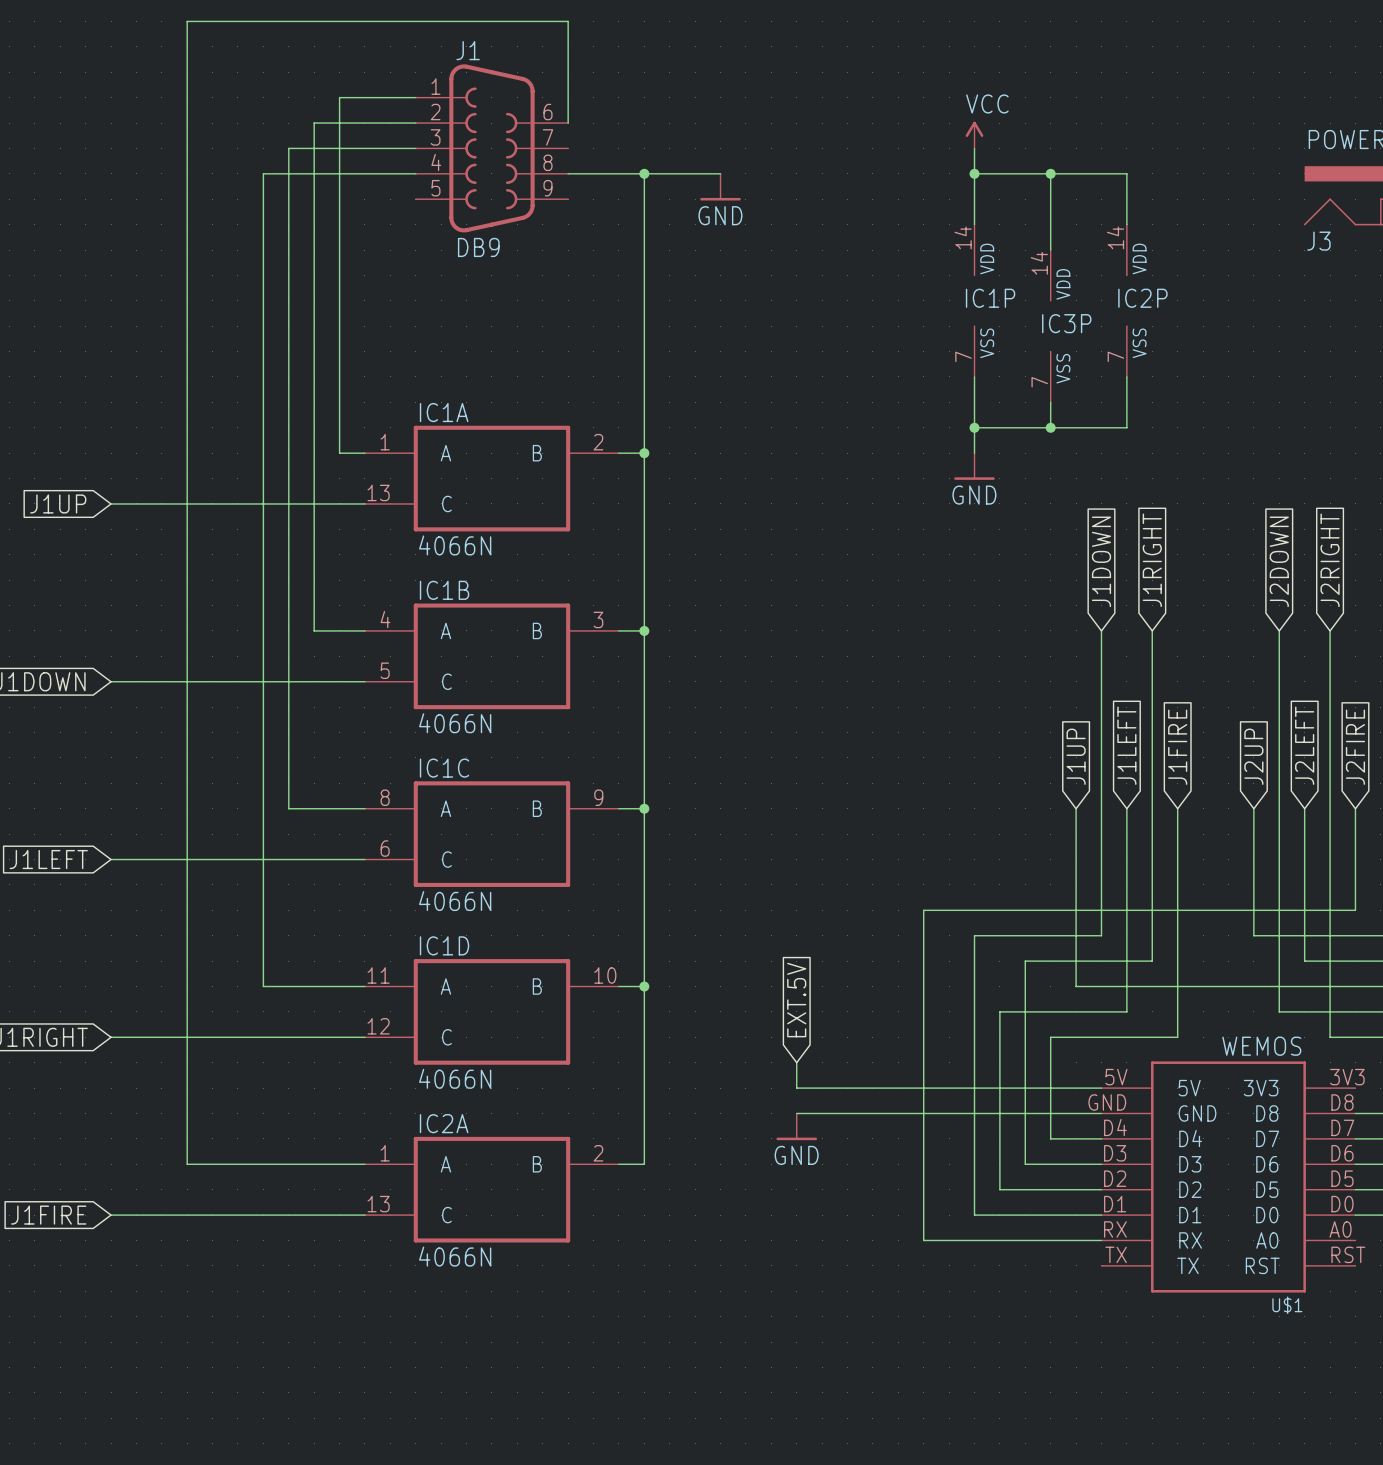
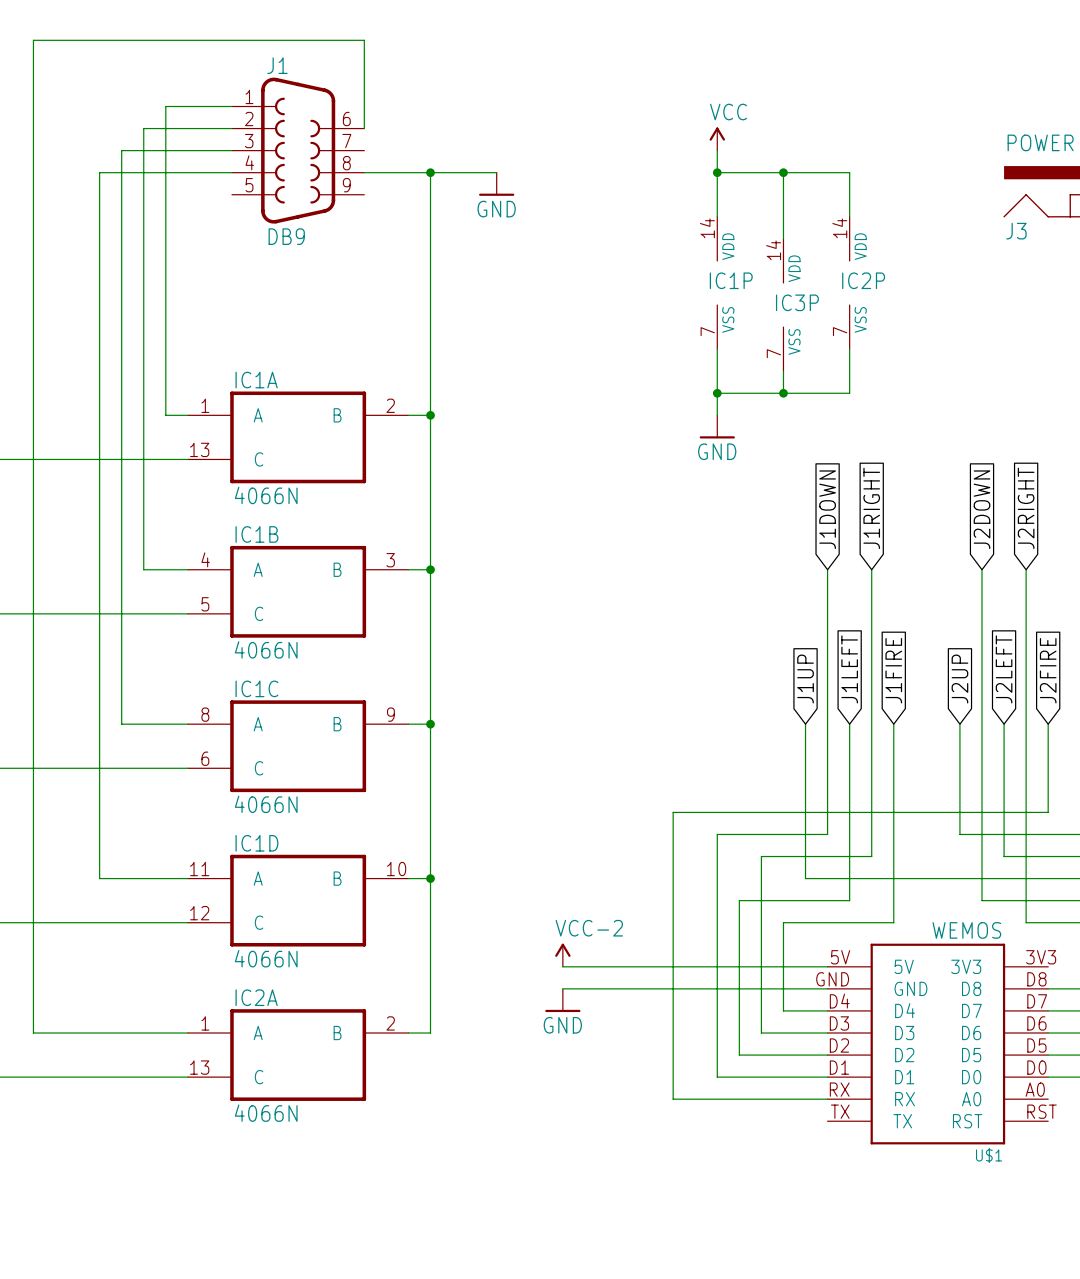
global label: EXT.5V (796, 1000) -> none
power symbol: none -> VCC-2 (562, 955)

